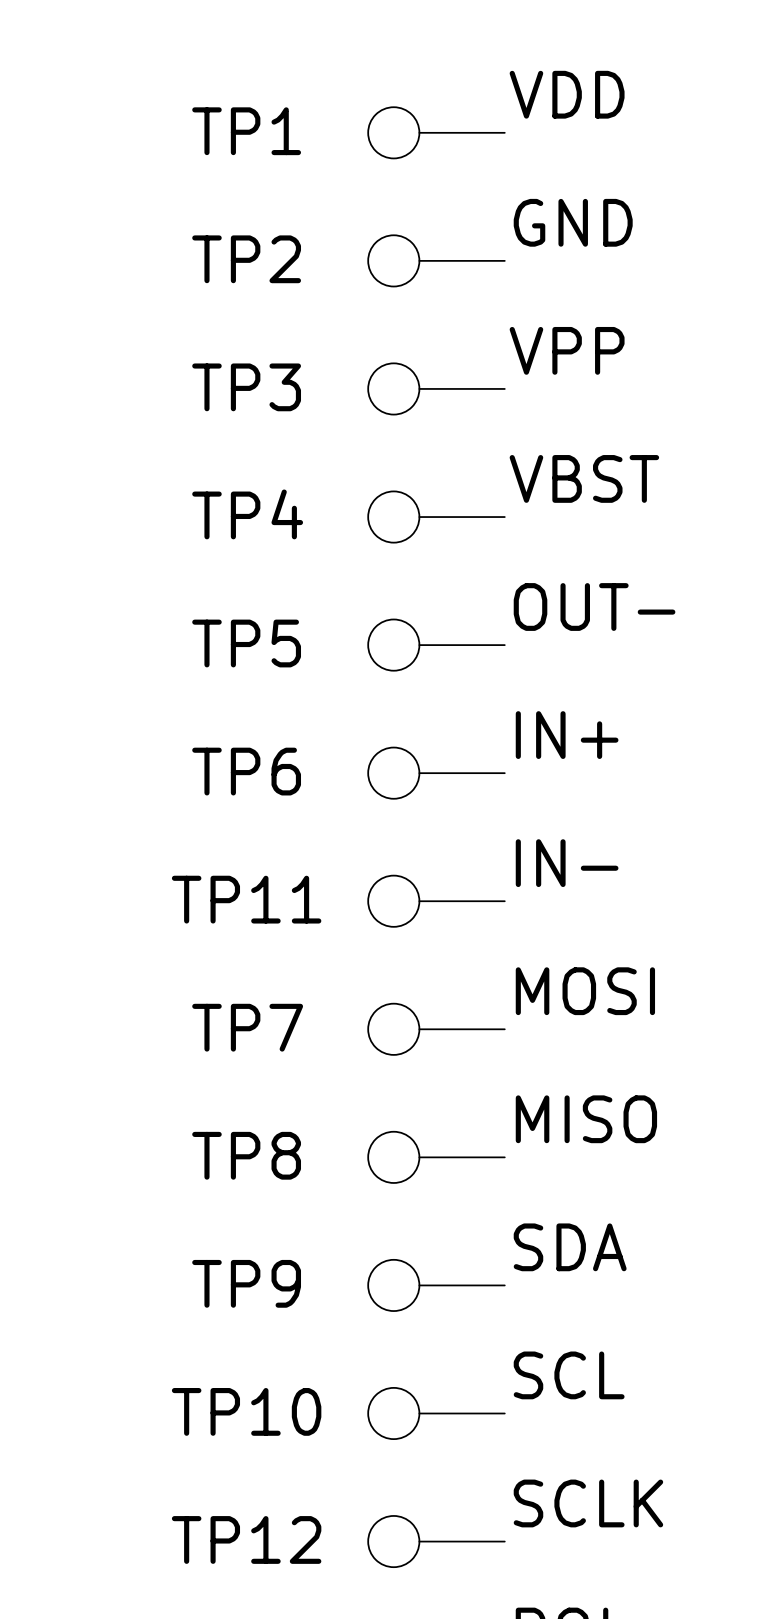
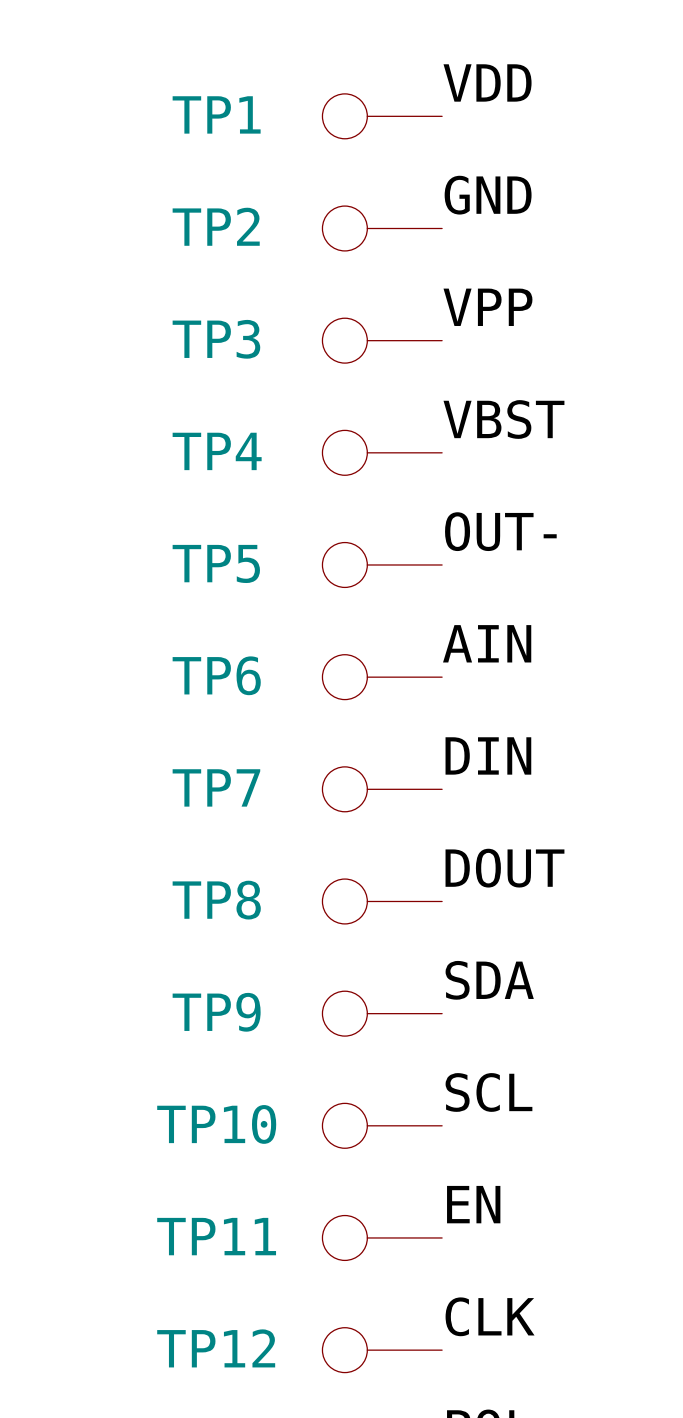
label: IN+ (567, 735) -> AIN (487, 643)
label: IN- (567, 863) -> DIN (488, 755)
TP11 name: TP11 (246, 899) -> TP7 (216, 787)
label: MOSI (585, 991) -> DOUT (504, 868)
TP7 name: TP7 (247, 1027) -> TP8 (216, 900)
label: MISO (586, 1119) -> SDA (489, 980)
TP8 name: TP8 (246, 1155) -> TP9 (216, 1012)
label: SDA (570, 1247) -> SCL (488, 1092)
TP9 name: TP9 (246, 1283) -> TP10 (216, 1124)
label: SCL (569, 1375) -> EN (473, 1204)
TP10 name: TP10 (246, 1411) -> TP11 (216, 1236)
label: SCLK (588, 1503) -> CLK (490, 1316)

